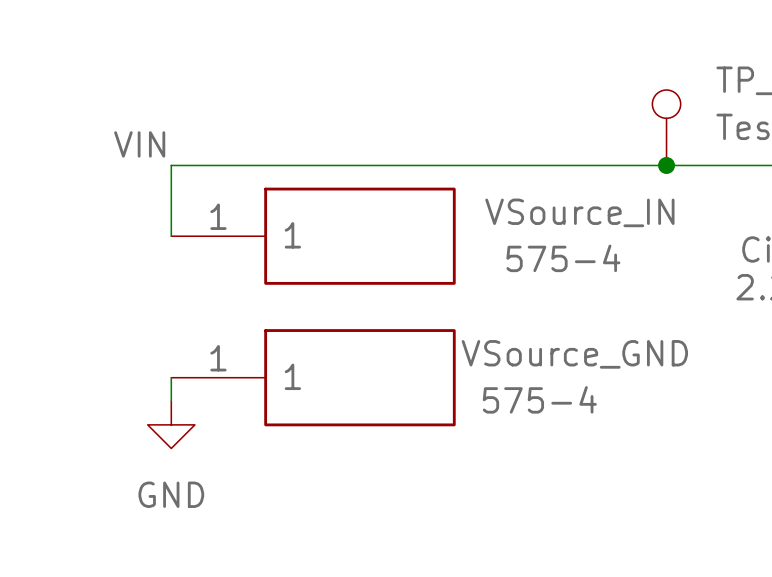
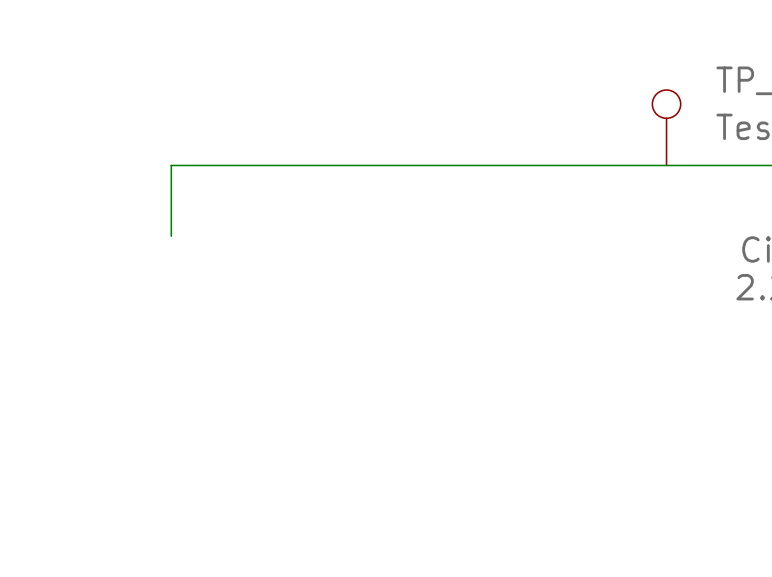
label: VIN (139, 144) -> none
junction: (666, 165) -> none
VSource_IN: 575-4 (313, 236) -> none
wire: (171, 377) (171, 401) -> none
VSource_GND: 575-4 (313, 377) -> none
power symbol: GND (171, 424) -> none

